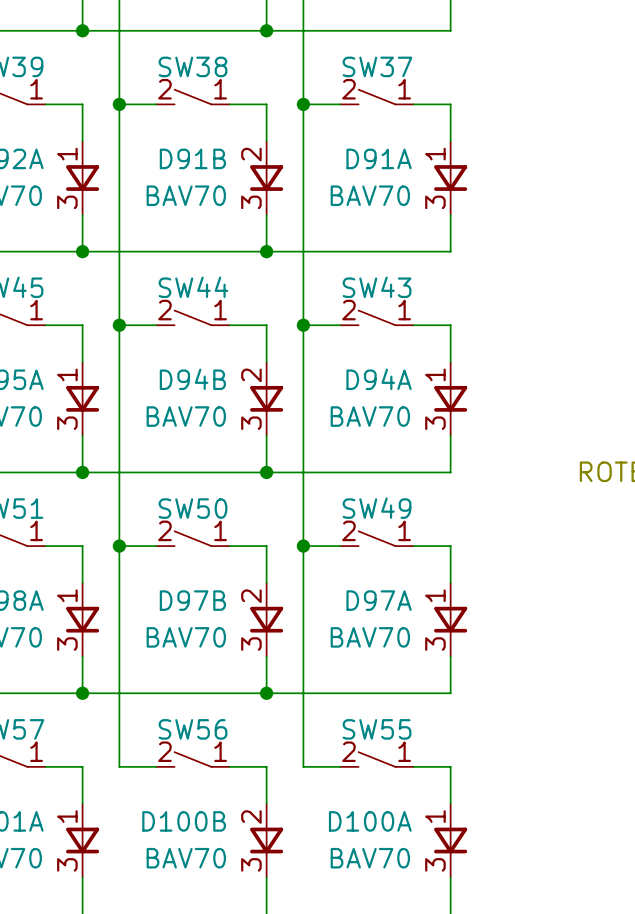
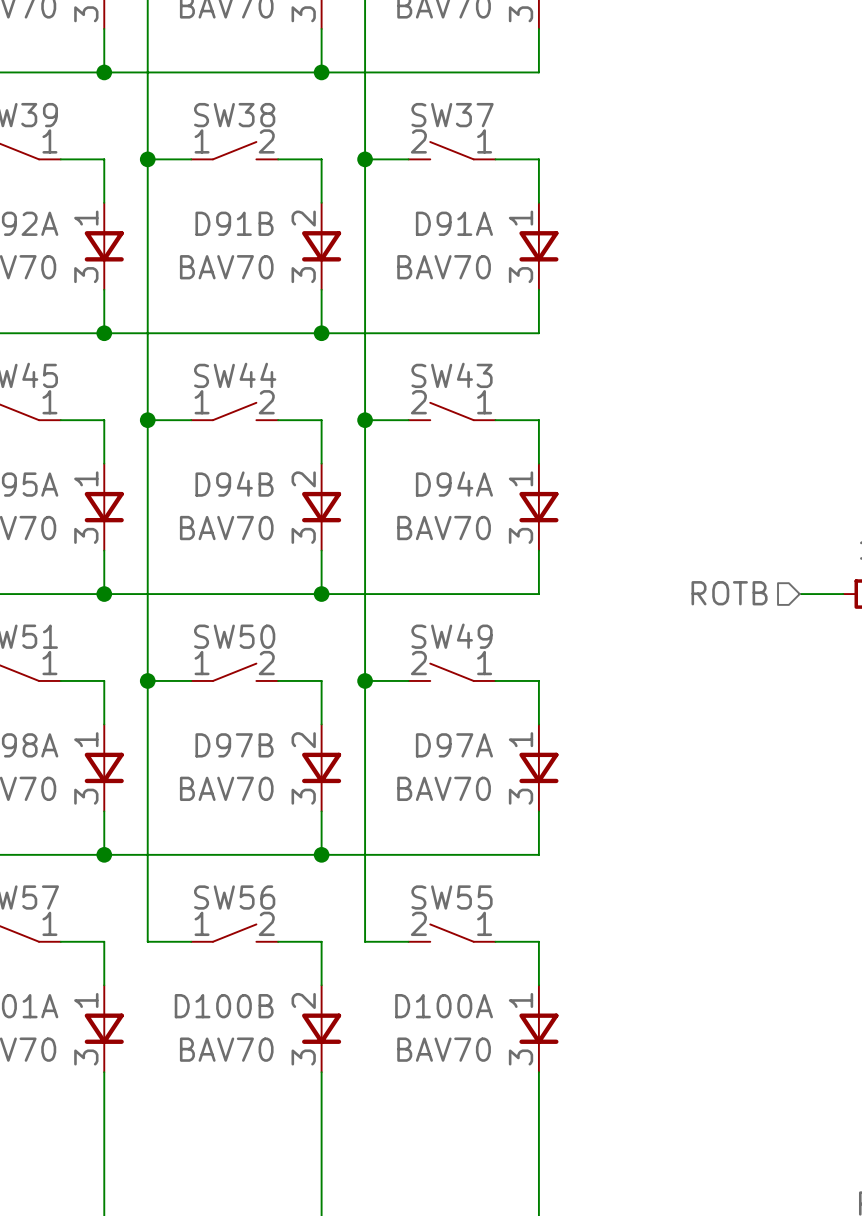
SW38 flip: as is (193, 97) -> left-right (234, 150)
SW44 flip: as is (193, 317) -> left-right (234, 411)
SW50 flip: as is (193, 538) -> left-right (234, 672)
SW56 flip: as is (193, 759) -> left-right (234, 933)

